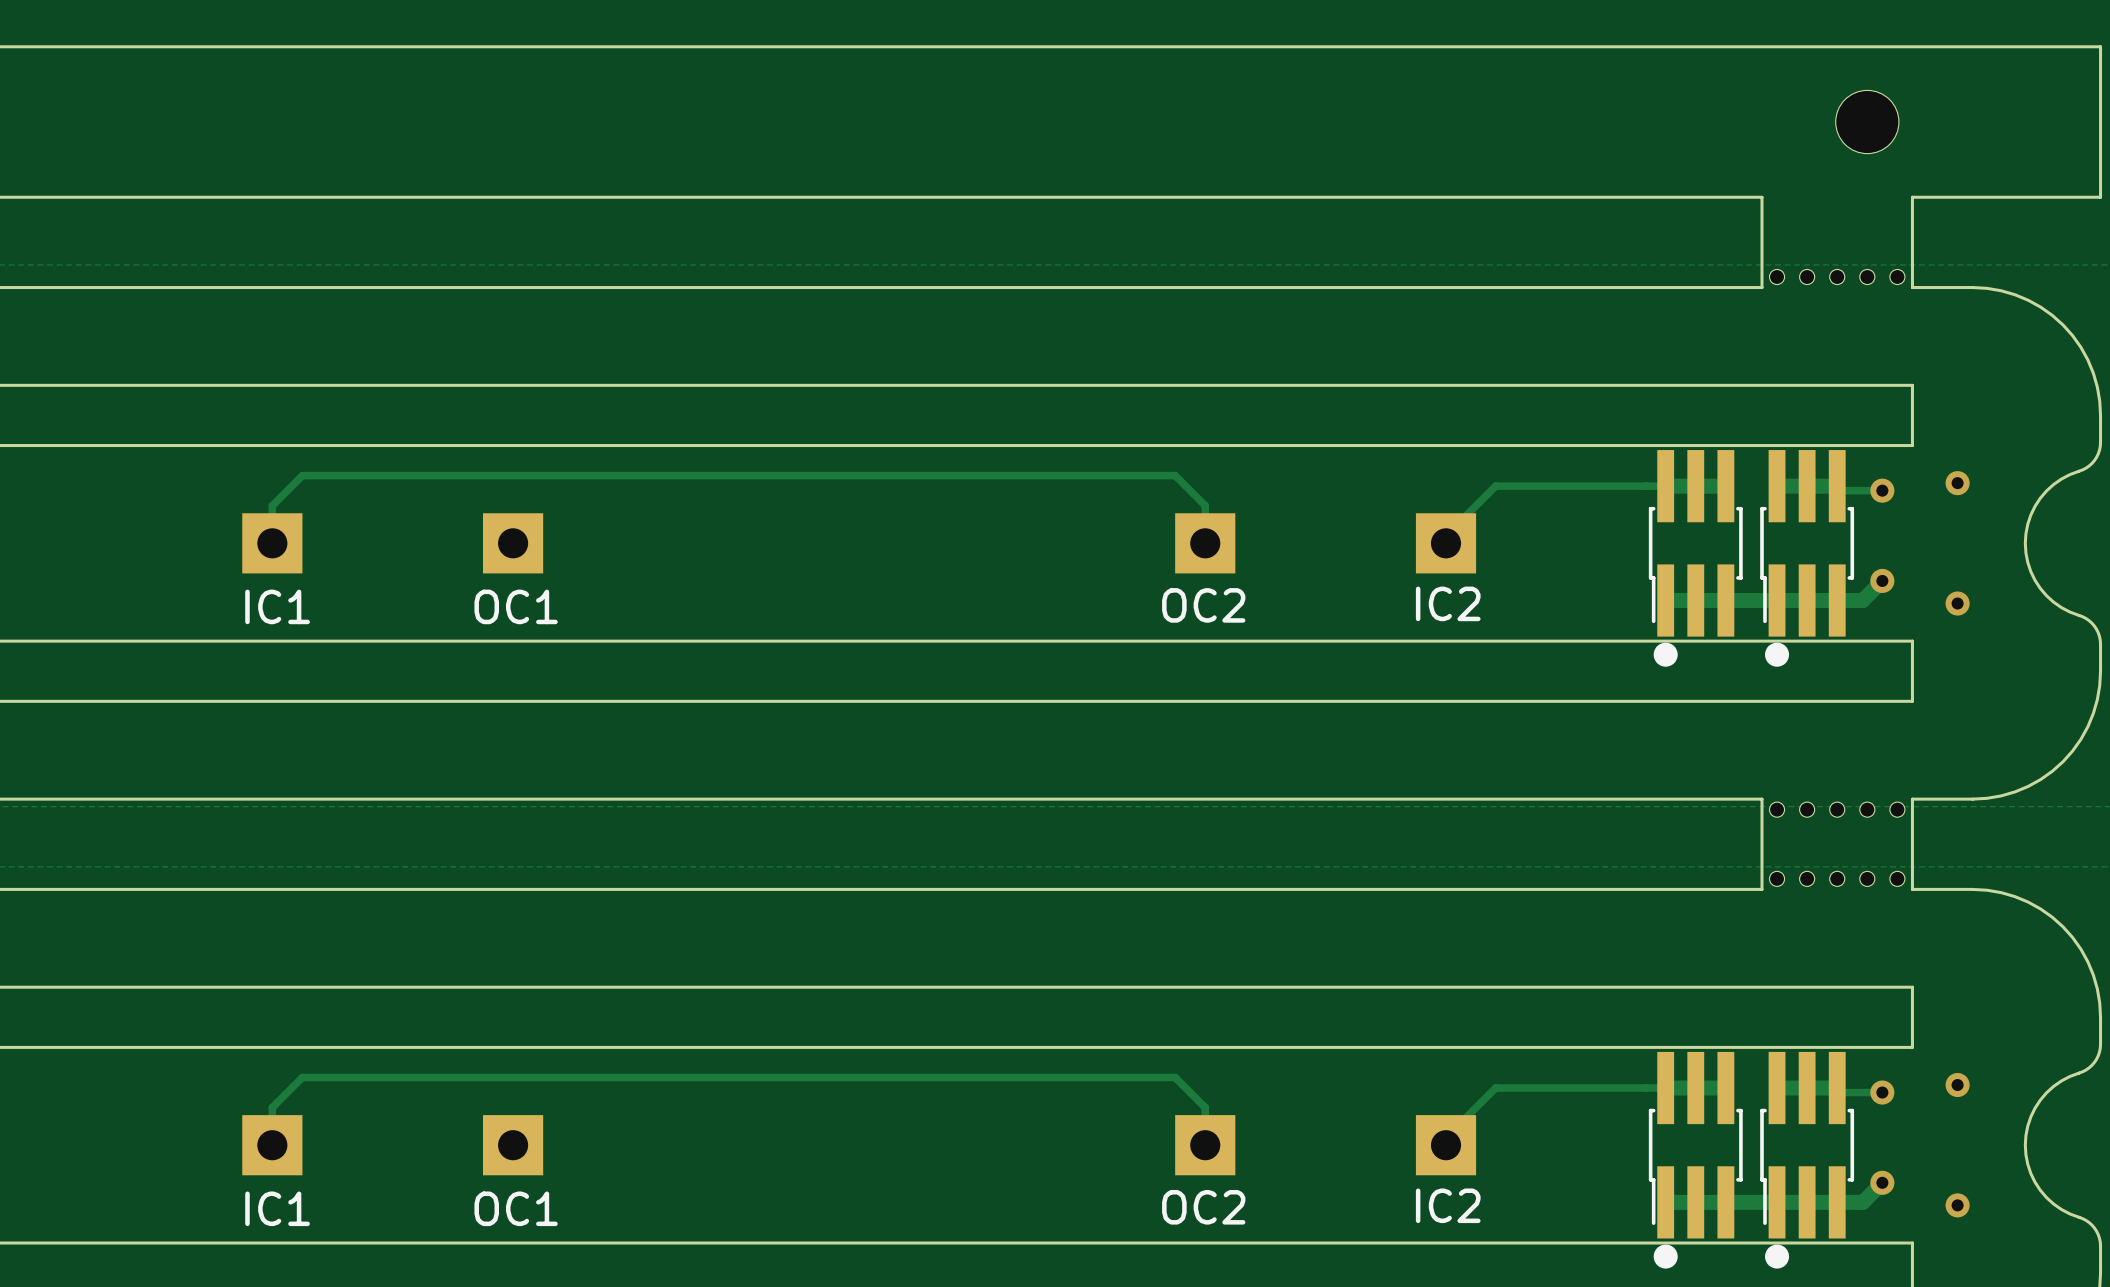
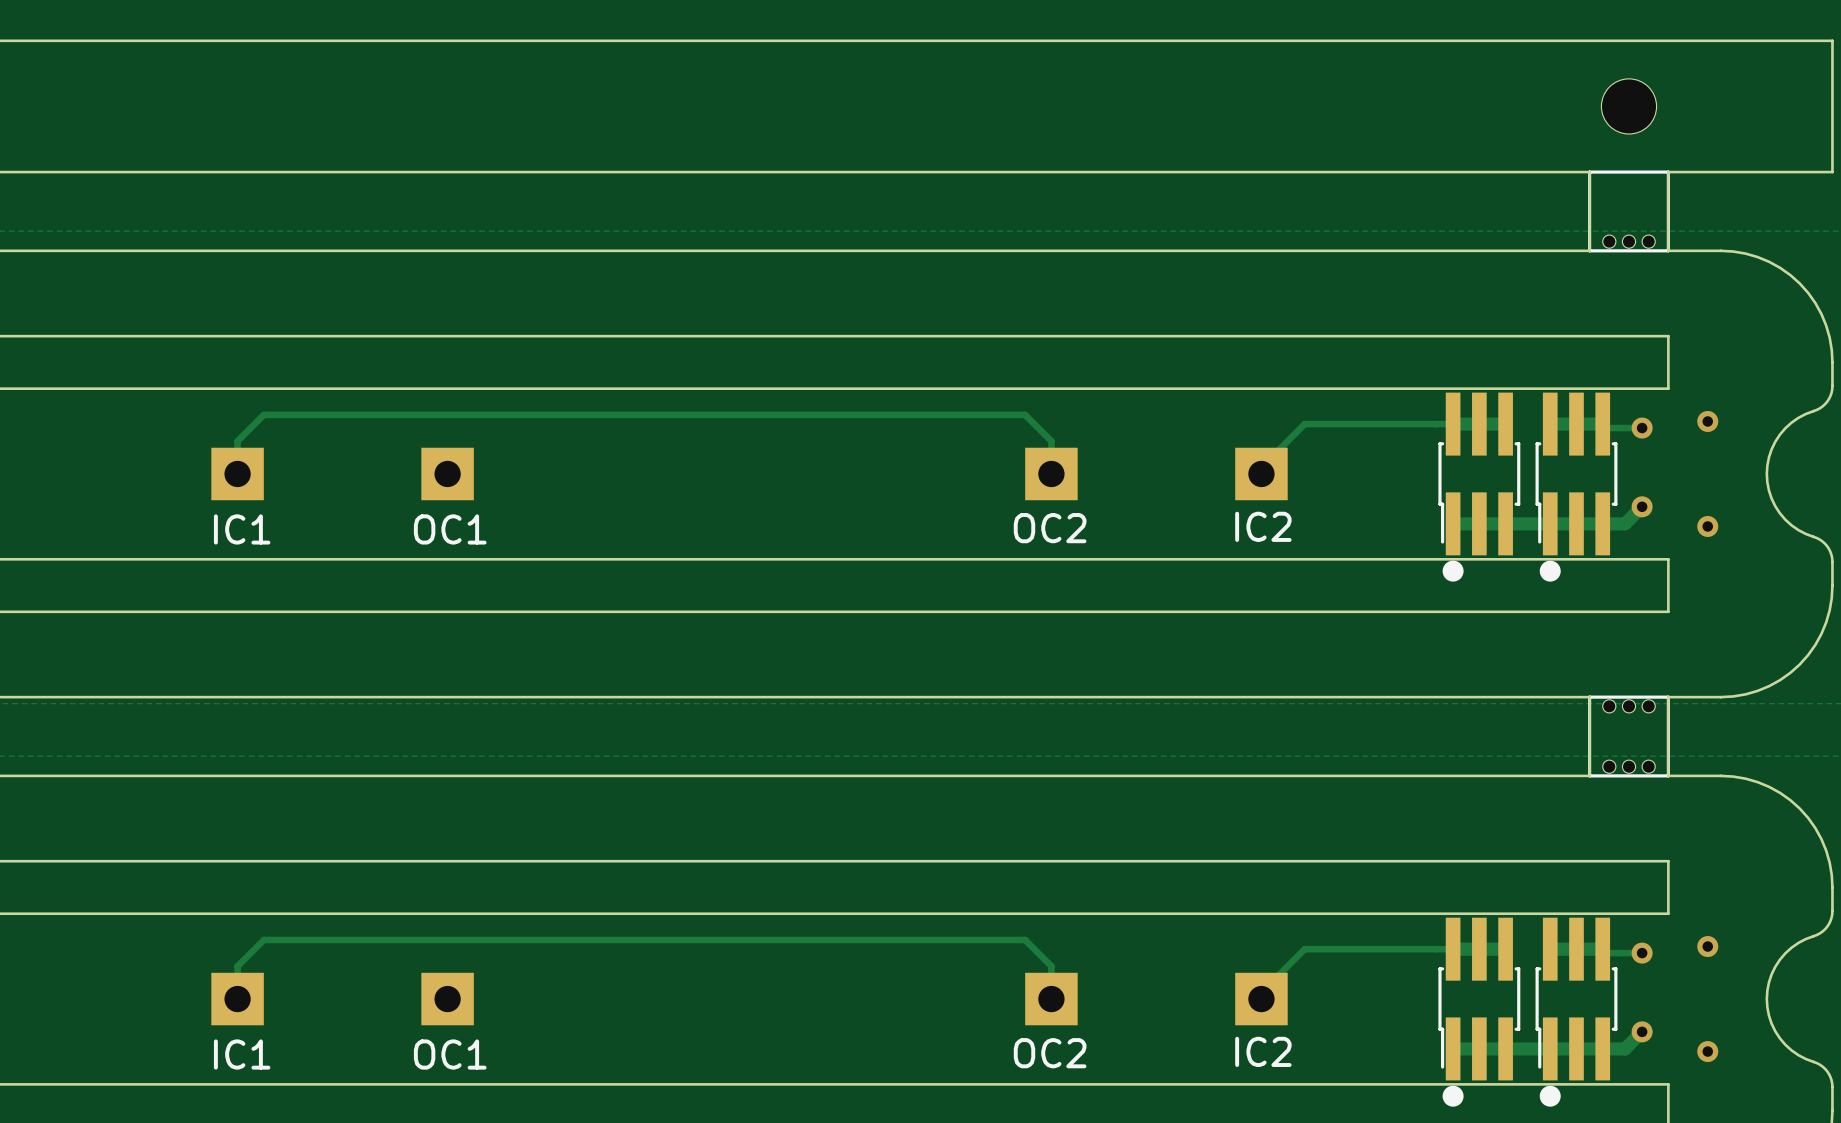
board edge: (1761, 197) (1761, 287) -> (1537, 172) (1589, 172) (1589, 250) (1537, 250)
part: none -> (1629, 211)
part: (1837, 277) -> none
board edge: (1761, 799) (1761, 889) -> (1537, 697) (1589, 697) (1589, 775) (1537, 775)
part footprint: [1769, 802, 1905, 887] -> [1588, 695, 1670, 778]

